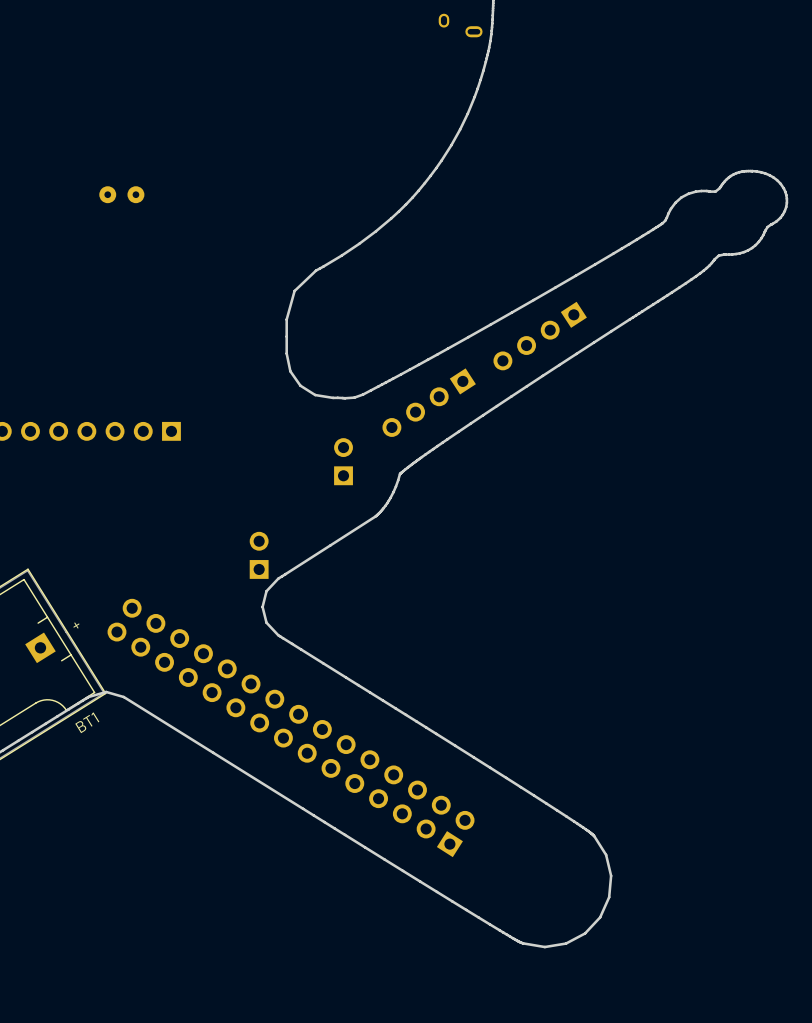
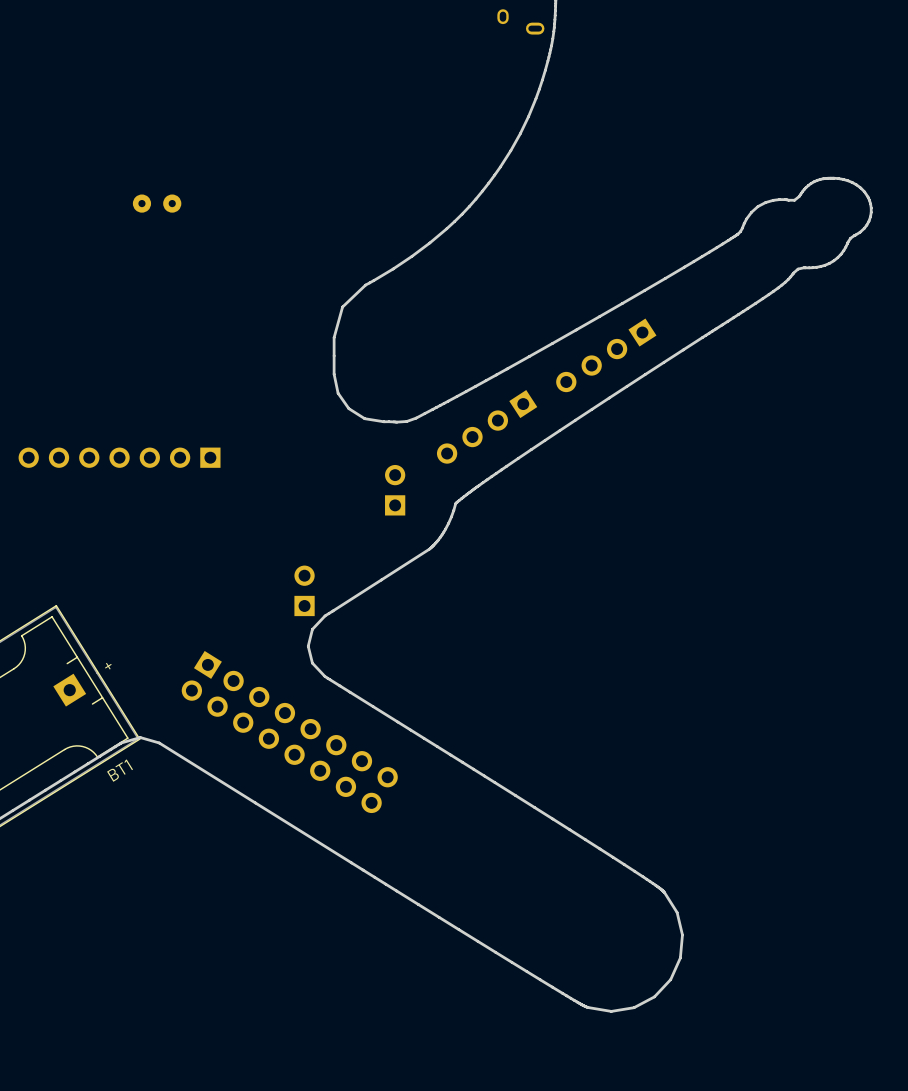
part: none -> (289, 732)
part: (291, 727) -> none

